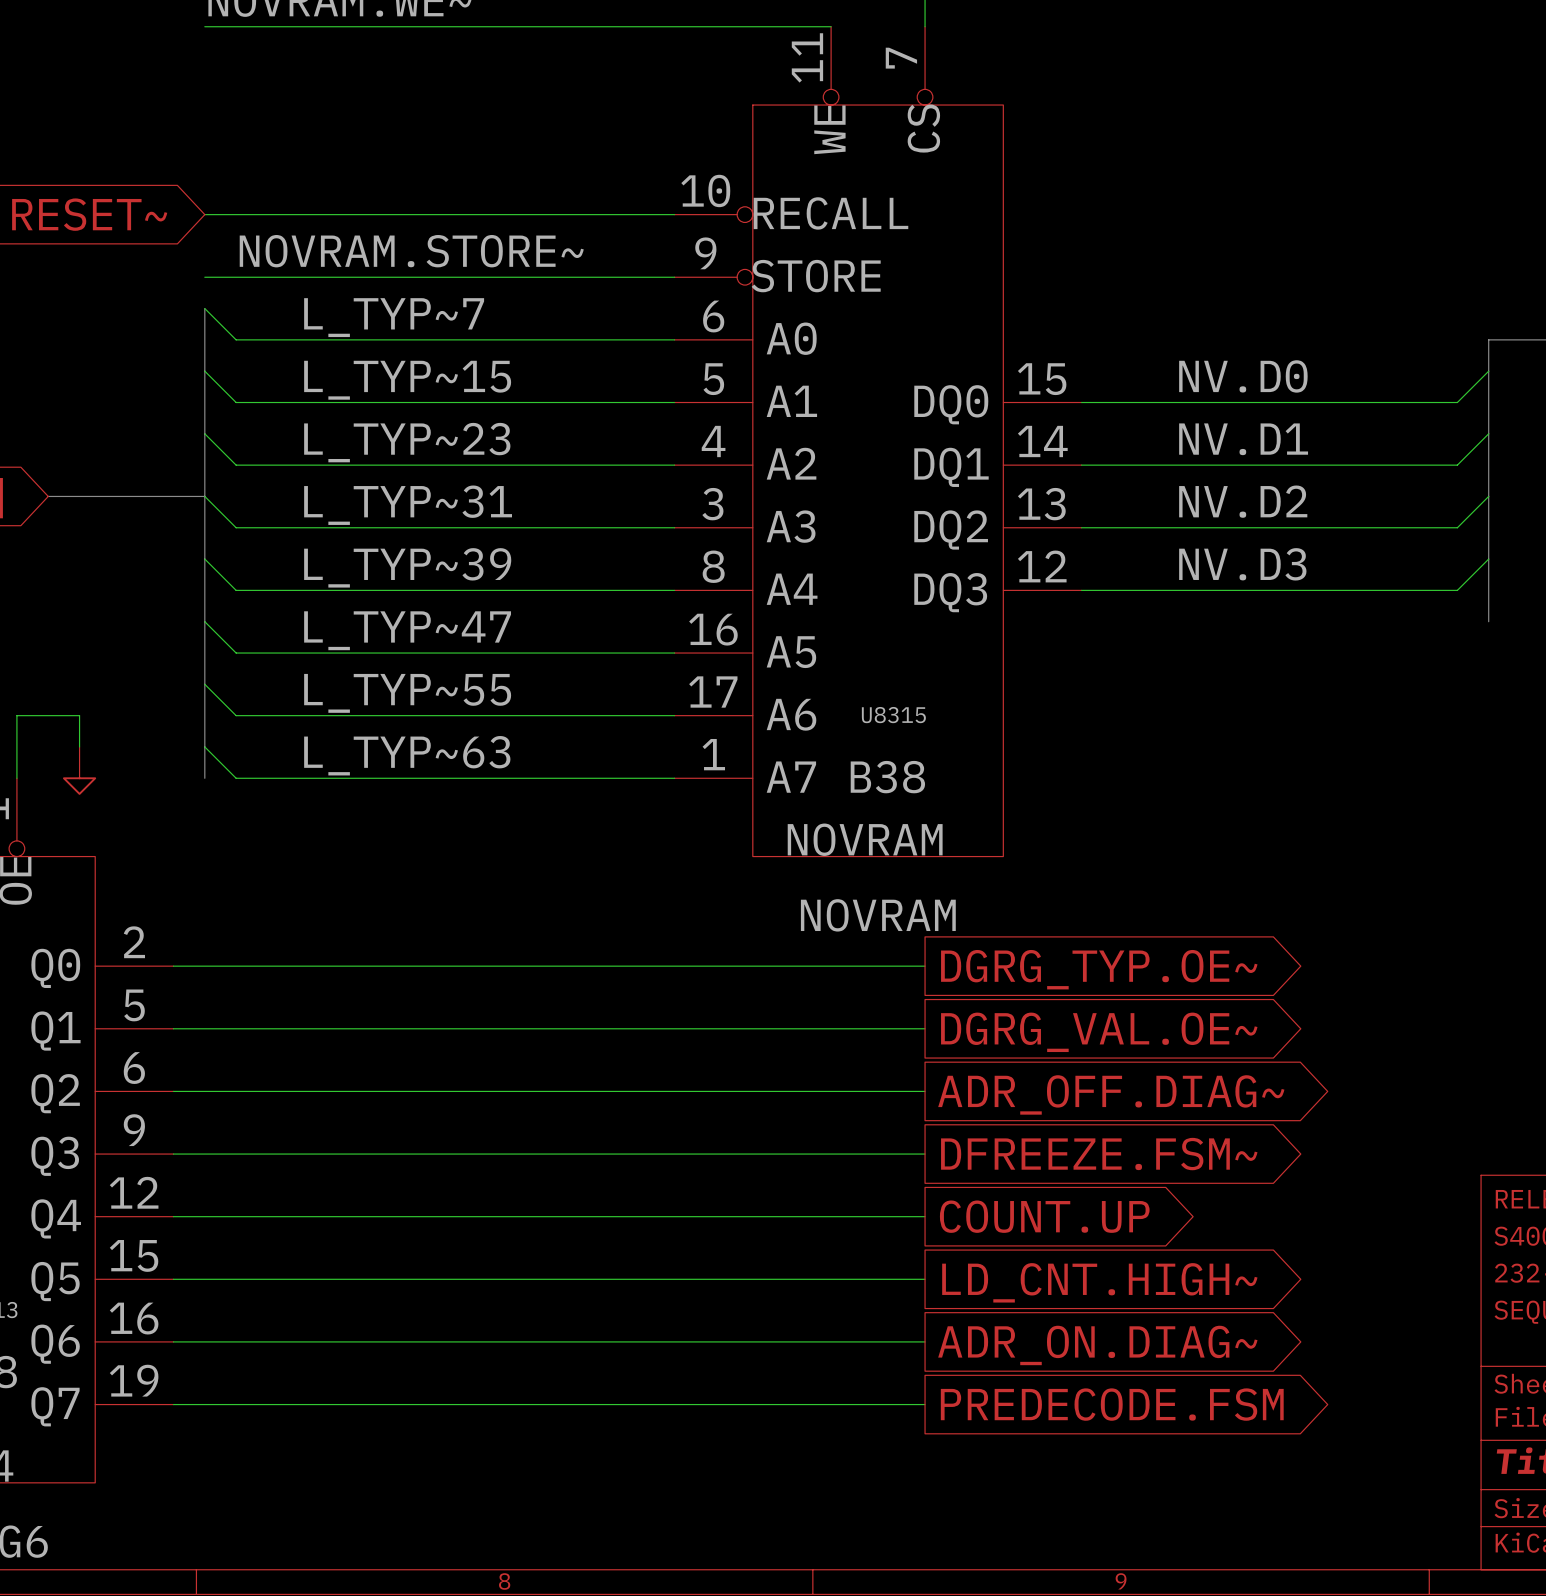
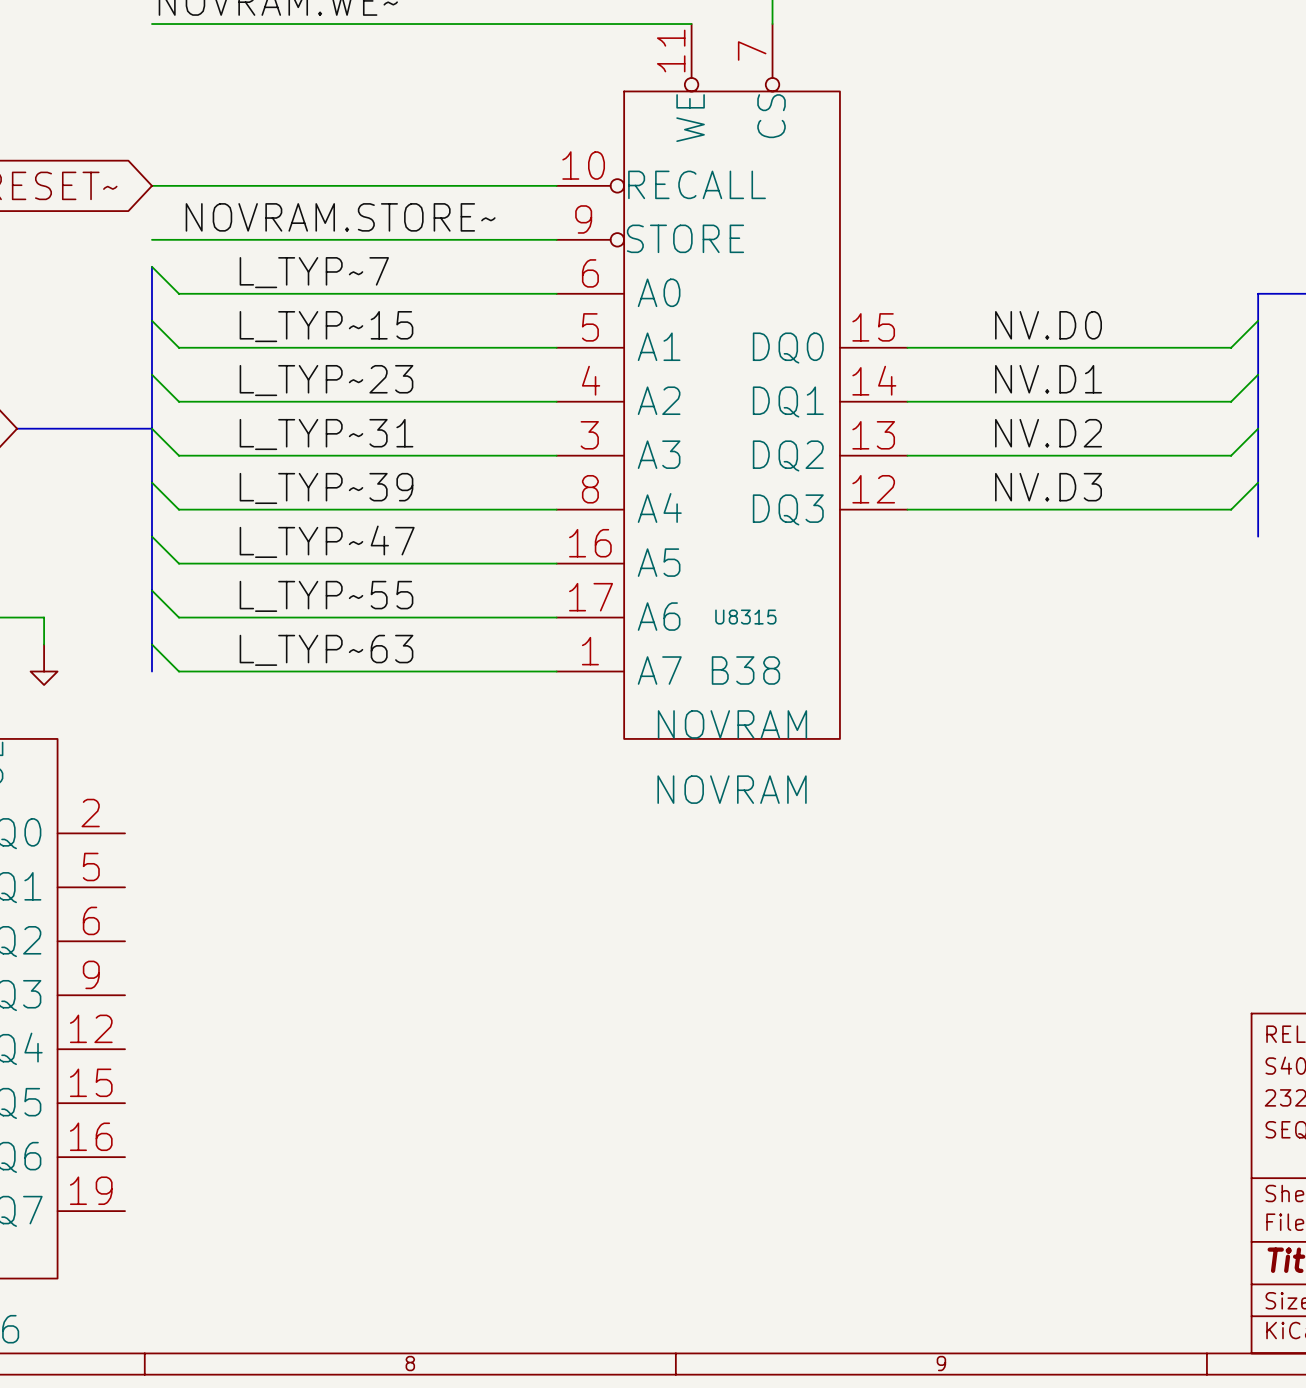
wire: (173, 966) (925, 966) -> none
global label: DGRG_TYP.OE~ (1099, 969) -> none
wire: (173, 1028) (925, 1028) -> none
global label: DGRG_VAL.OE~ (1099, 1032) -> none
wire: (173, 1091) (925, 1091) -> none
global label: ADR_OFF.DIAG~ (1111, 1094) -> none
wire: (173, 1154) (925, 1154) -> none
global label: DFREEZE.FSM~ (1099, 1154) -> none
wire: (173, 1216) (925, 1216) -> none
global label: COUNT.UP (1044, 1216) -> none
wire: (173, 1279) (925, 1279) -> none
global label: LD_CNT.HIGH~ (1099, 1282) -> none
wire: (173, 1341) (925, 1341) -> none
global label: ADR_ON.DIAG~ (1097, 1345) -> none
wire: (173, 1404) (925, 1404) -> none
global label: PREDECODE.FSM (1112, 1404) -> none

